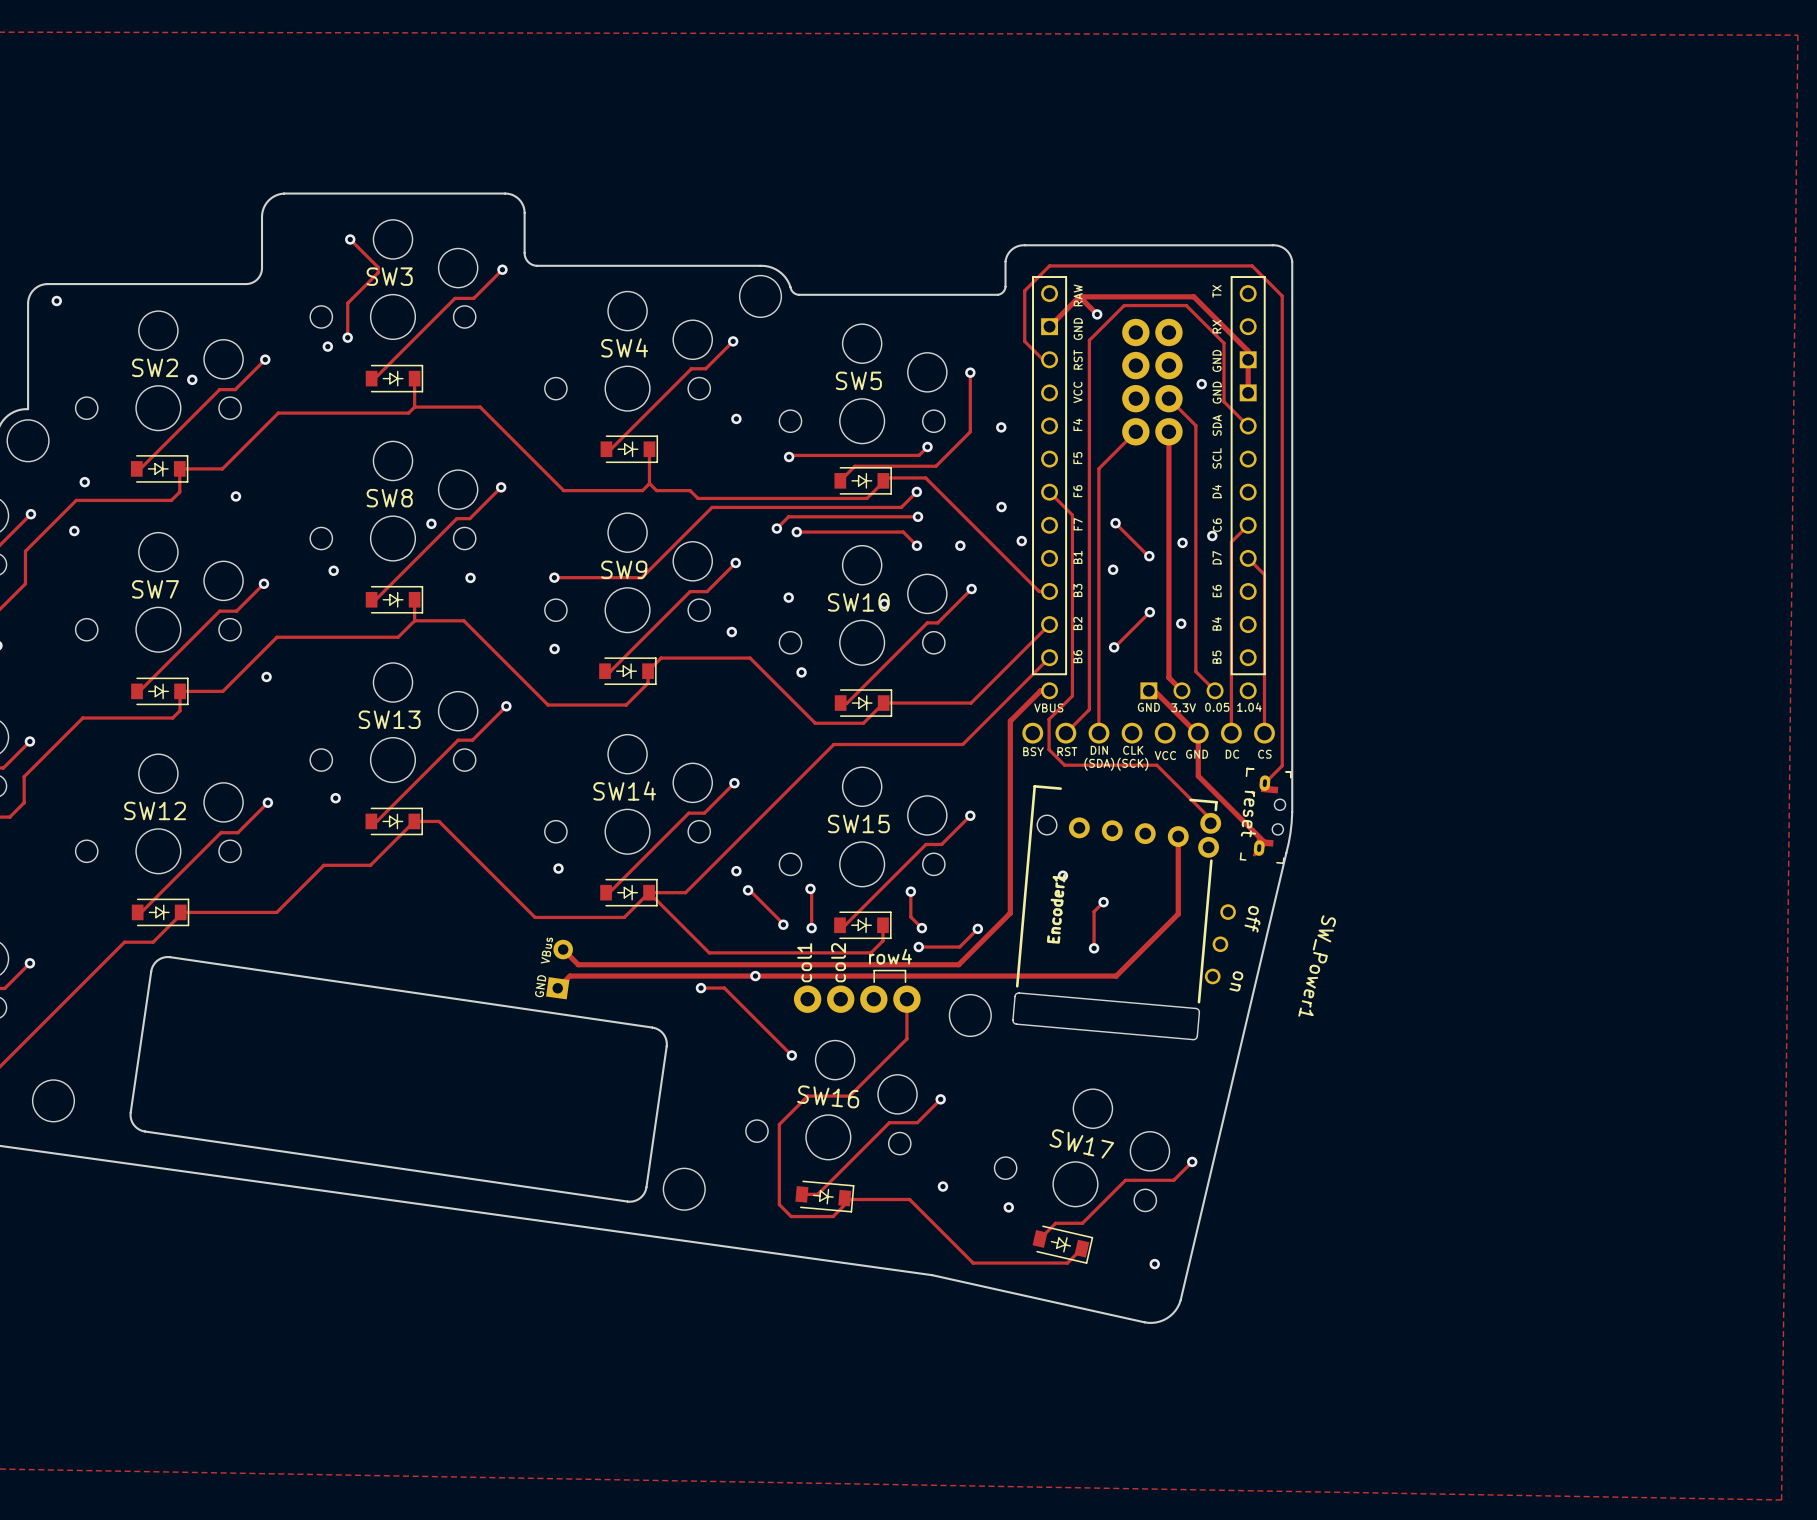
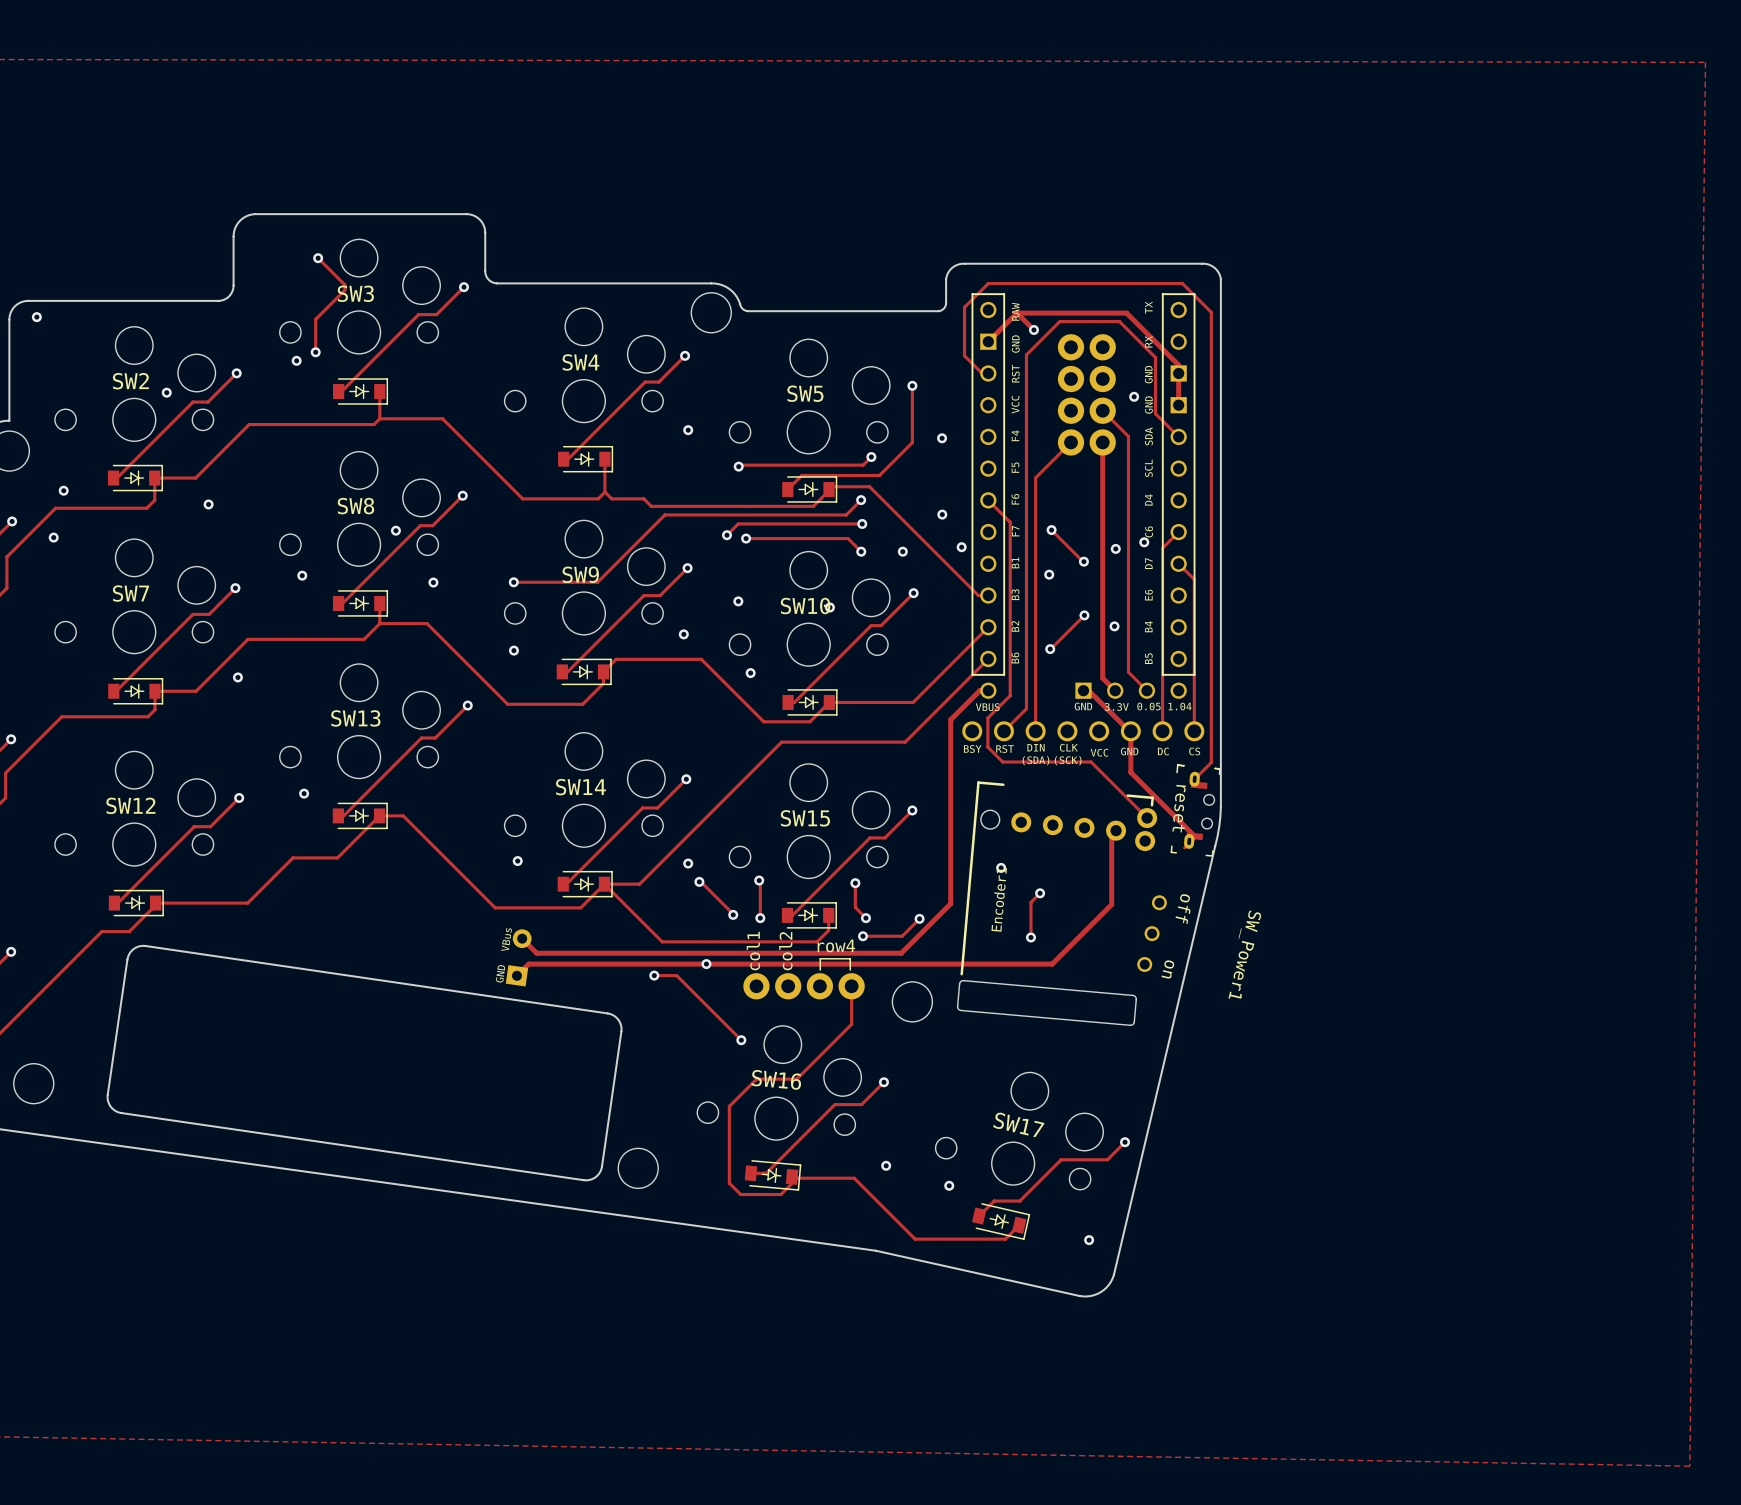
Encoder1 footprint: [1012, 785, 1222, 1040] -> [957, 781, 1158, 1026]

